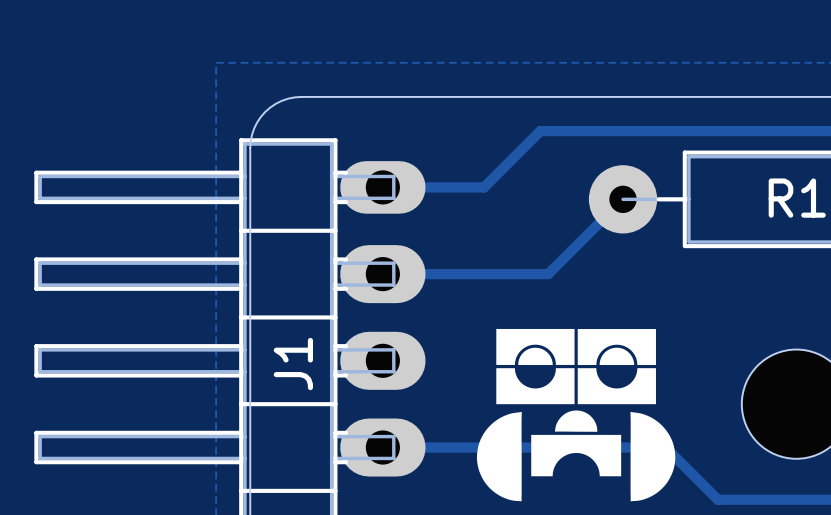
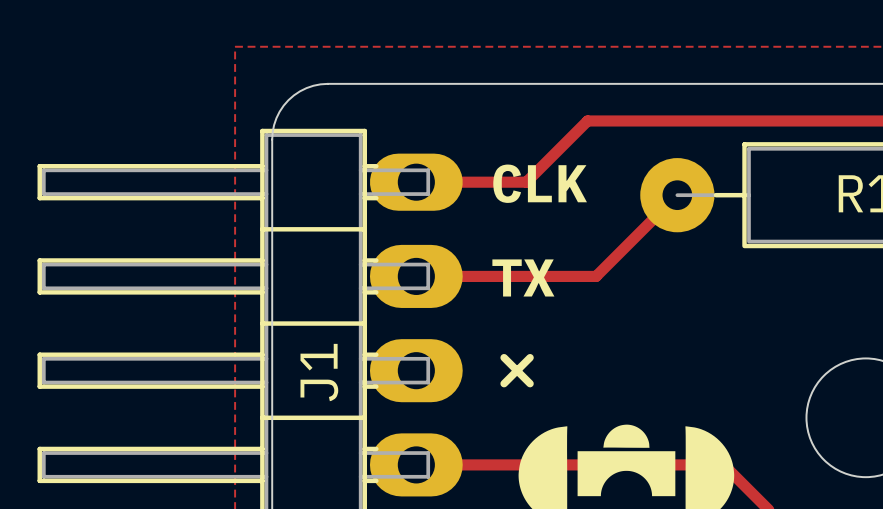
text: none -> CLK (540, 183)
text: none -> TX (523, 277)
drawing: [496, 328, 656, 405] -> none
line: none -> (504, 357) (530, 383)
line: none -> (530, 357) (504, 383)

